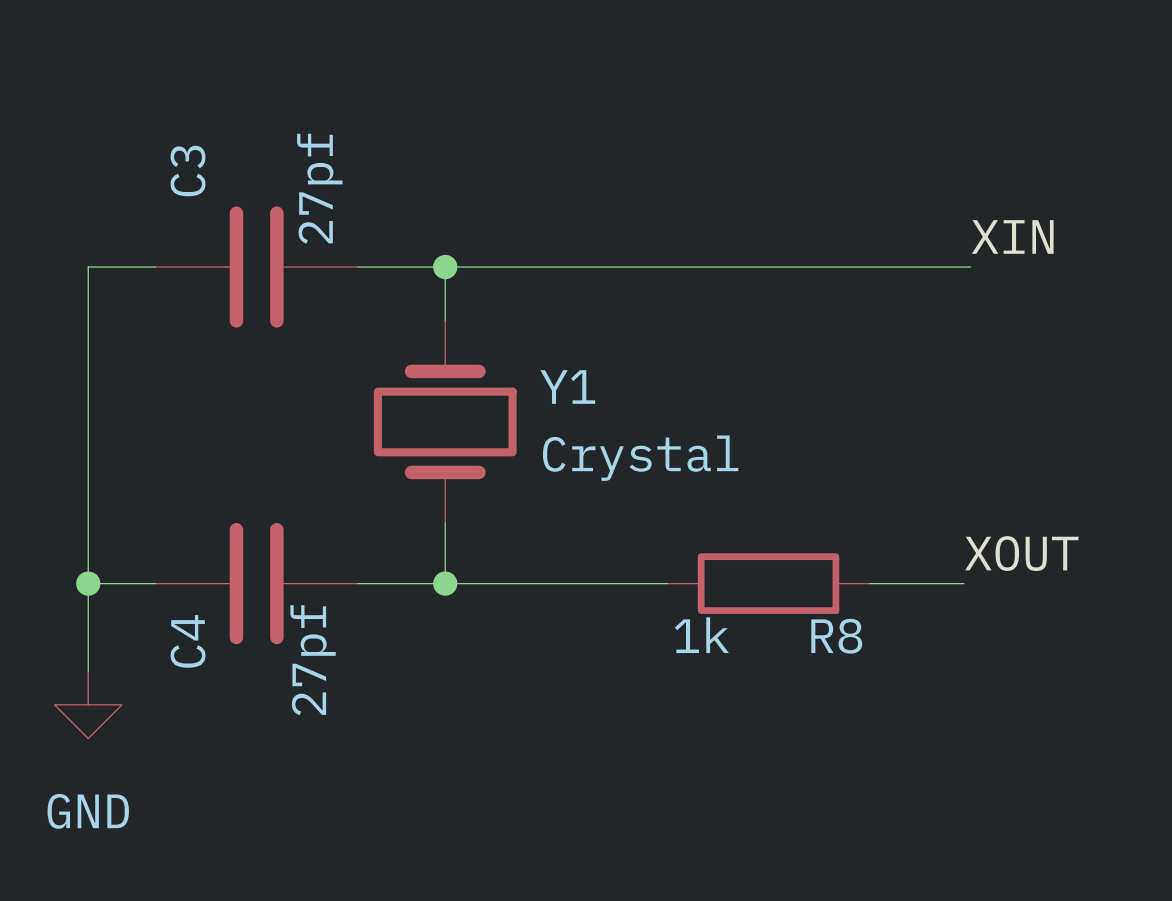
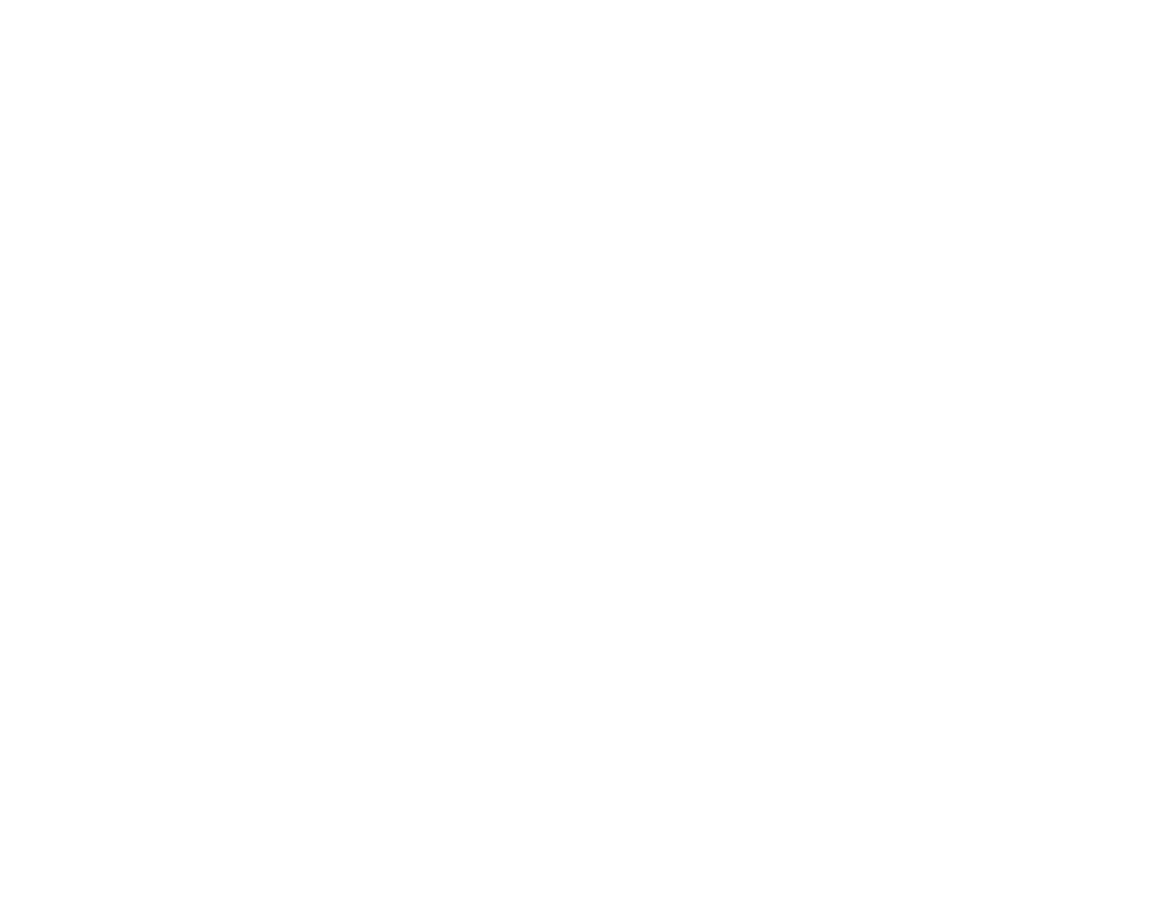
label: XIN (1012, 236) -> none
wire: (155, 267) (88, 267) (88, 671) -> none
C3: 27pf (256, 267) -> none
wire: (357, 267) (970, 267) -> none
wire: (445, 267) (445, 320) -> none
junction: (445, 267) -> none
Y1: Crystal (445, 421) -> none
wire: (445, 522) (445, 583) -> none
label: XOUT (1021, 553) -> none
wire: (88, 583) (155, 583) -> none
junction: (88, 583) -> none
C4: 27pf (256, 583) -> none
wire: (357, 583) (667, 583) -> none
junction: (445, 583) -> none
R8: 1k (768, 583) -> none
wire: (869, 583) (963, 583) -> none
power symbol: GND (88, 704) -> none

